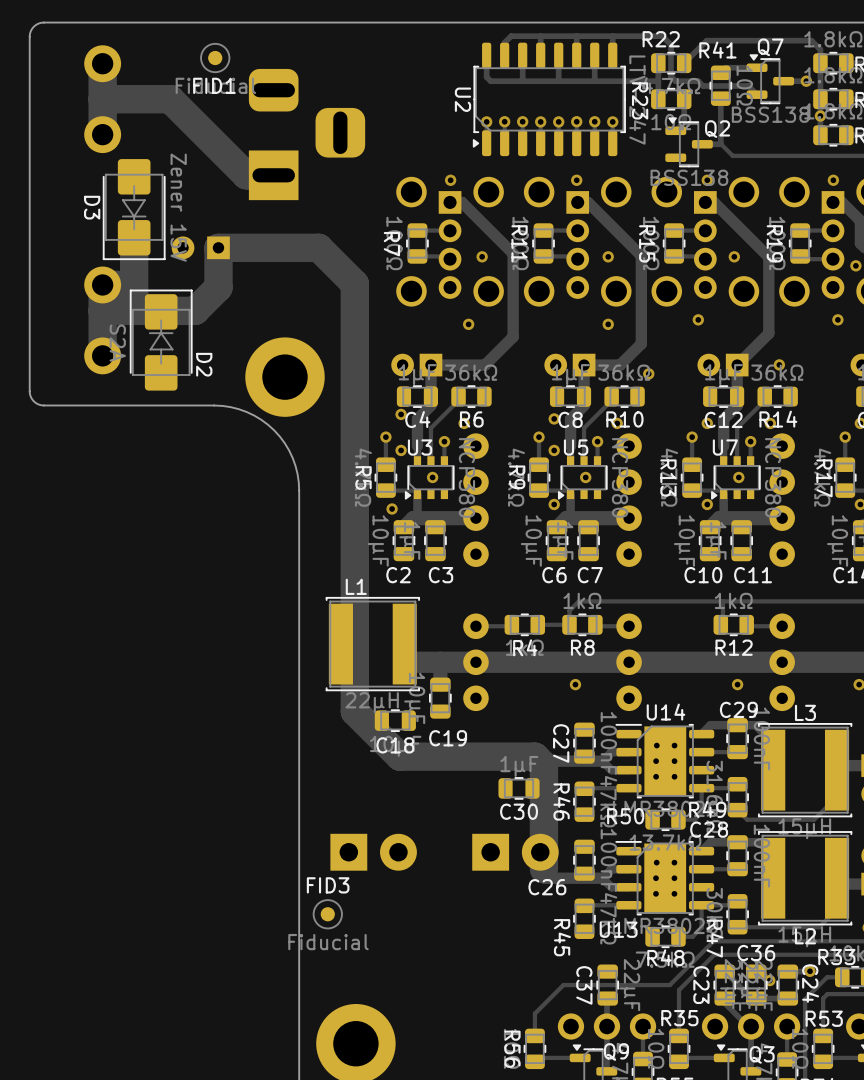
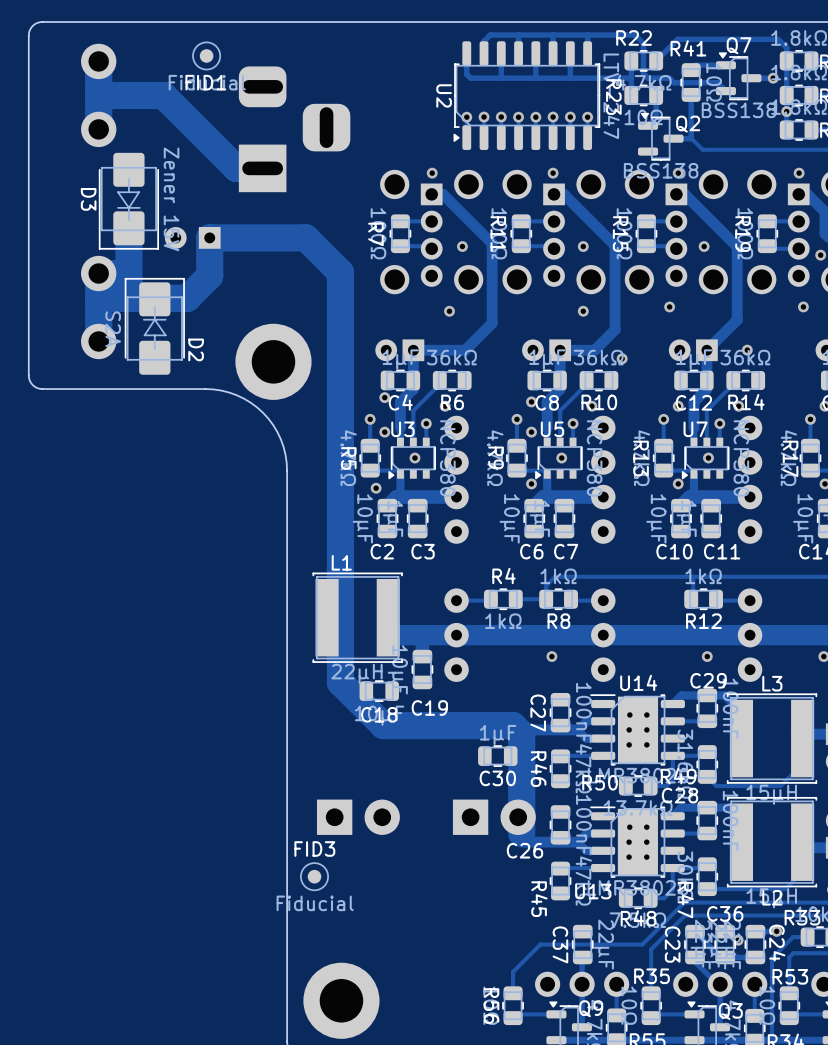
R4 name position: R4 (525, 647) -> R4 (503, 576)

